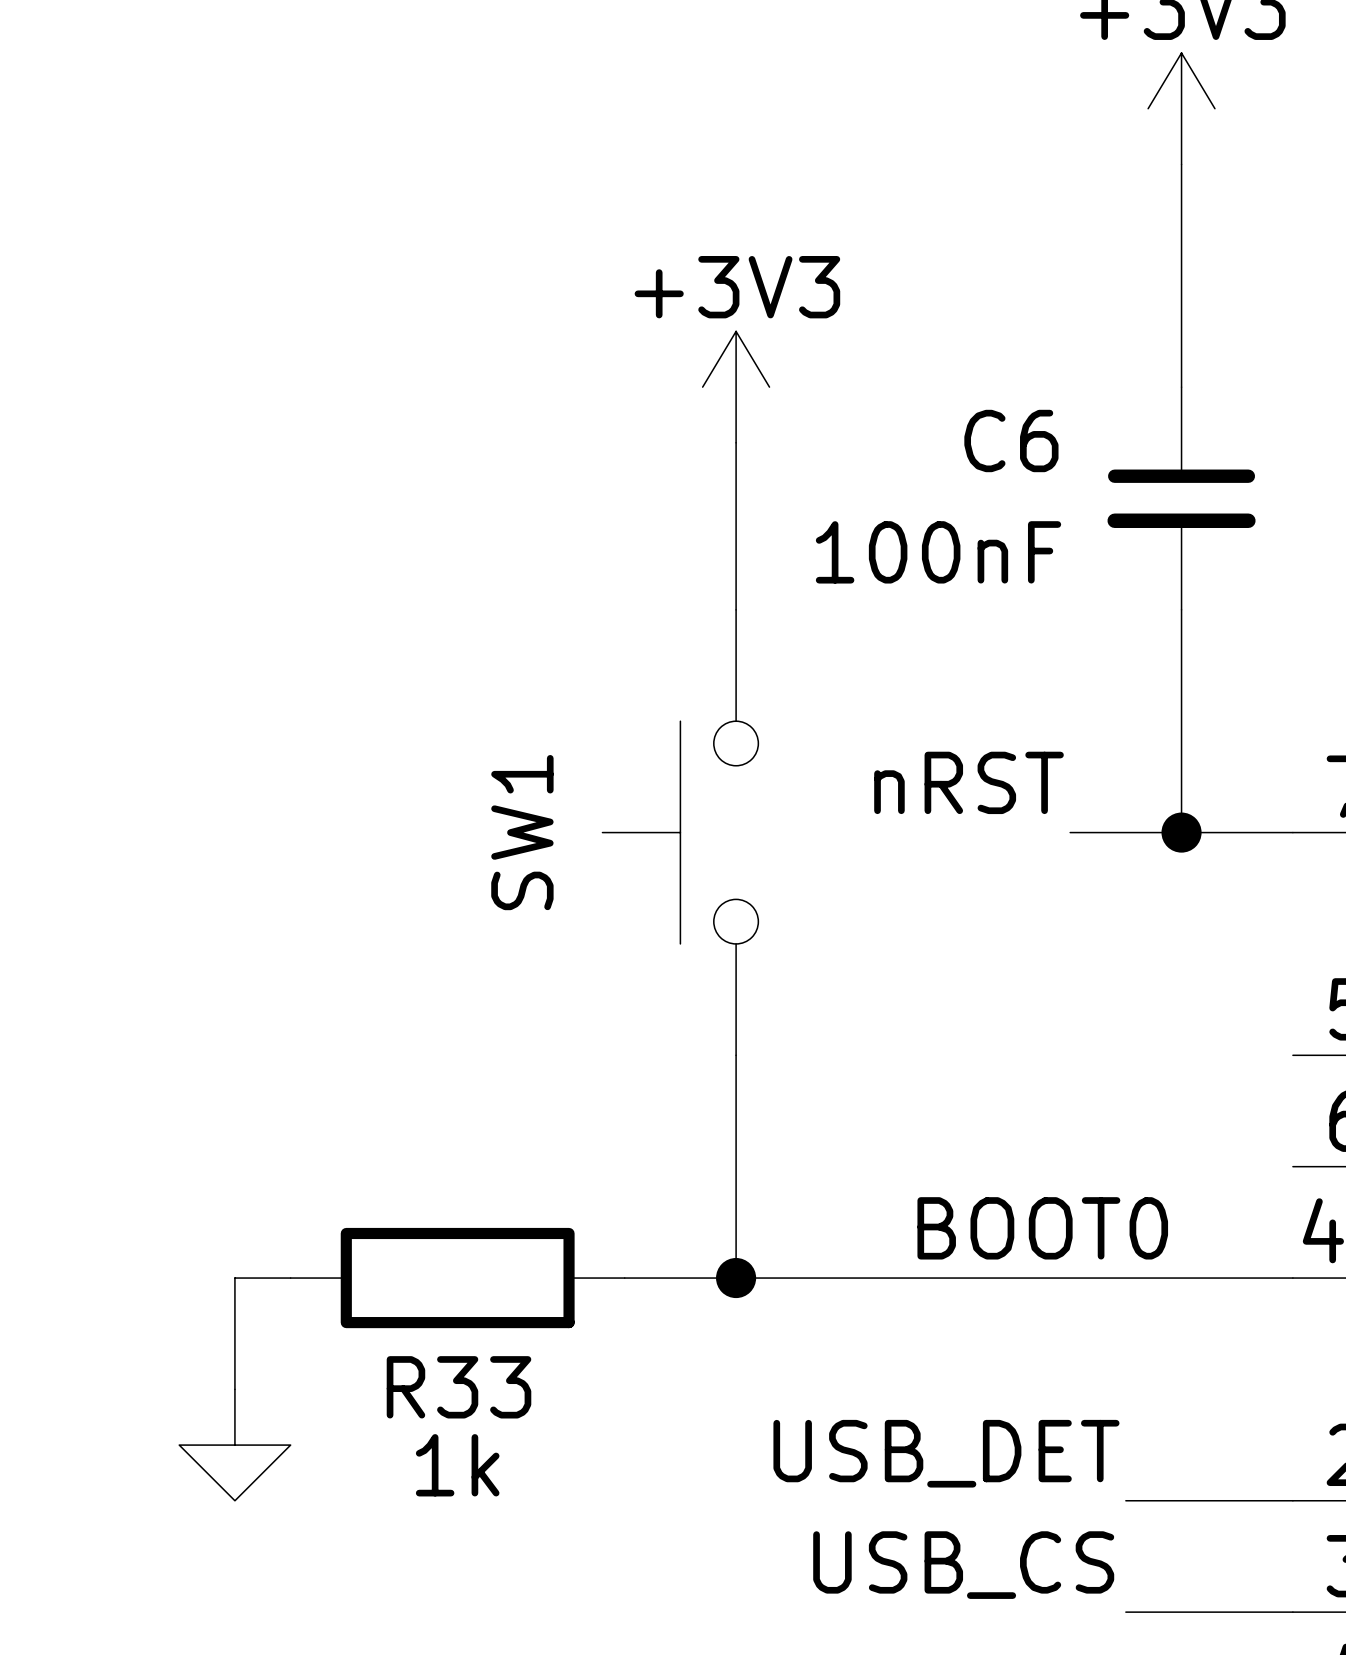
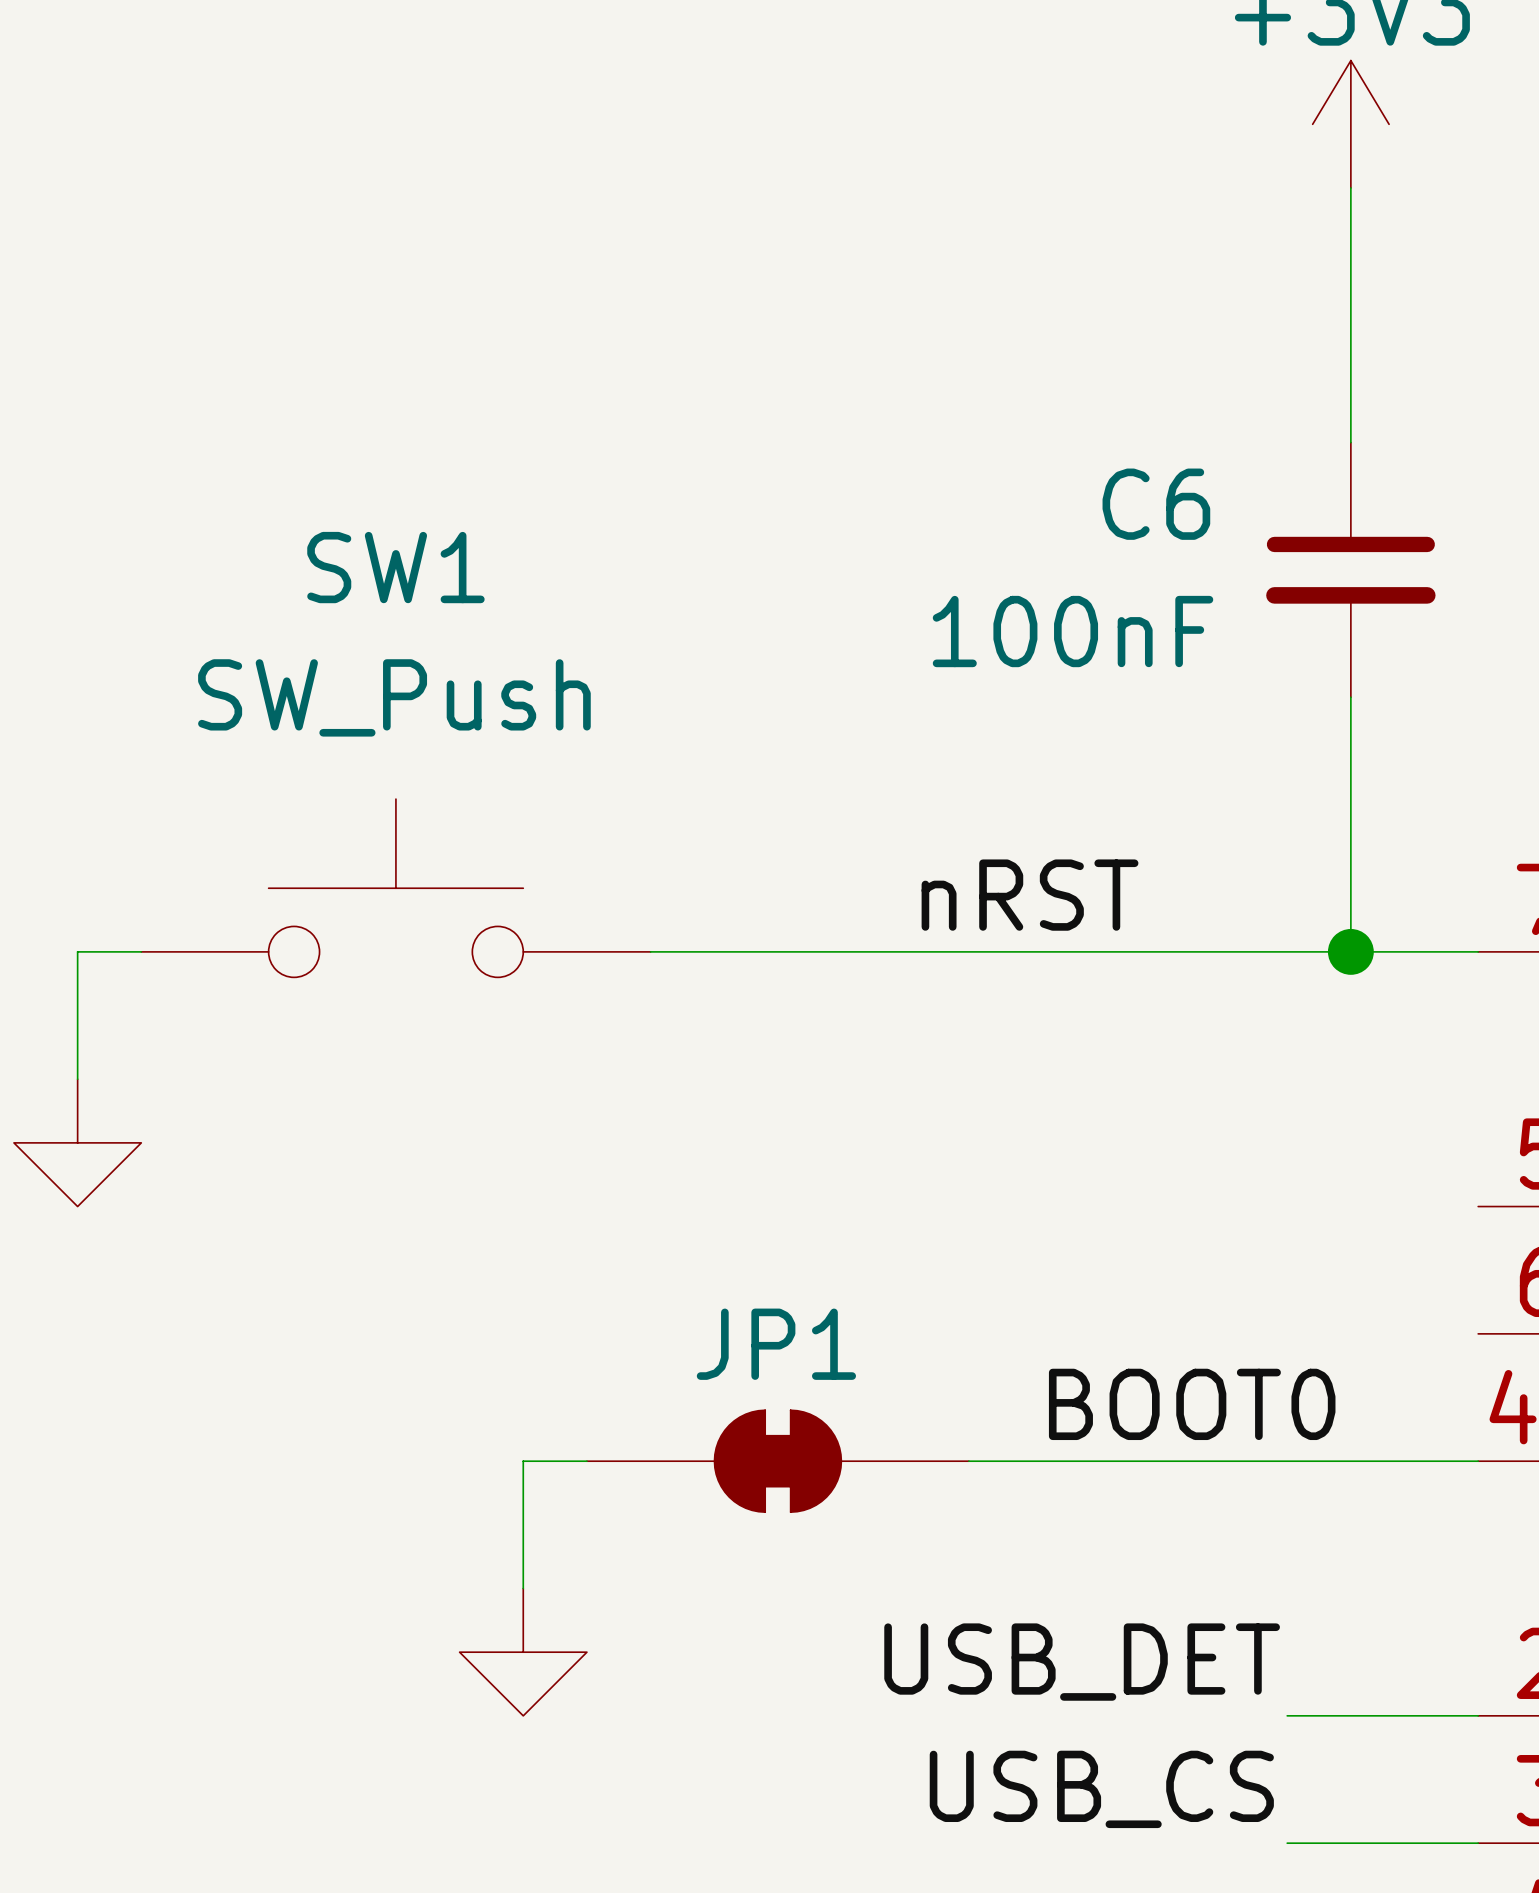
power symbol: +3V3 (736, 387) -> none
wire: (736, 442) (736, 609) -> none
SW1 value: none -> SW_Push (394, 697)
label position: nRST (969, 782) -> nRST (1030, 895)
wire: none -> (141, 951) (77, 951) (77, 1079)
SW1 name position: SW1 (522, 832) -> SW1 (395, 567)
wire: none -> (650, 951) (1223, 951)
SW1 rotation: 0° (680, 832) -> 90° clockwise (395, 888)
SW1 position: (680, 832) -> (395, 888)
power symbol: none -> (77, 1142)
wire: (736, 1055) (736, 1278) -> none
wire: (290, 1278) (234, 1278) (234, 1389) -> (586, 1461) (523, 1461) (523, 1588)
R33: 1k (457, 1278) -> none
JP1: none -> (777, 1461)
junction: (736, 1278) -> none
power symbol position: (234, 1445) -> (523, 1652)

